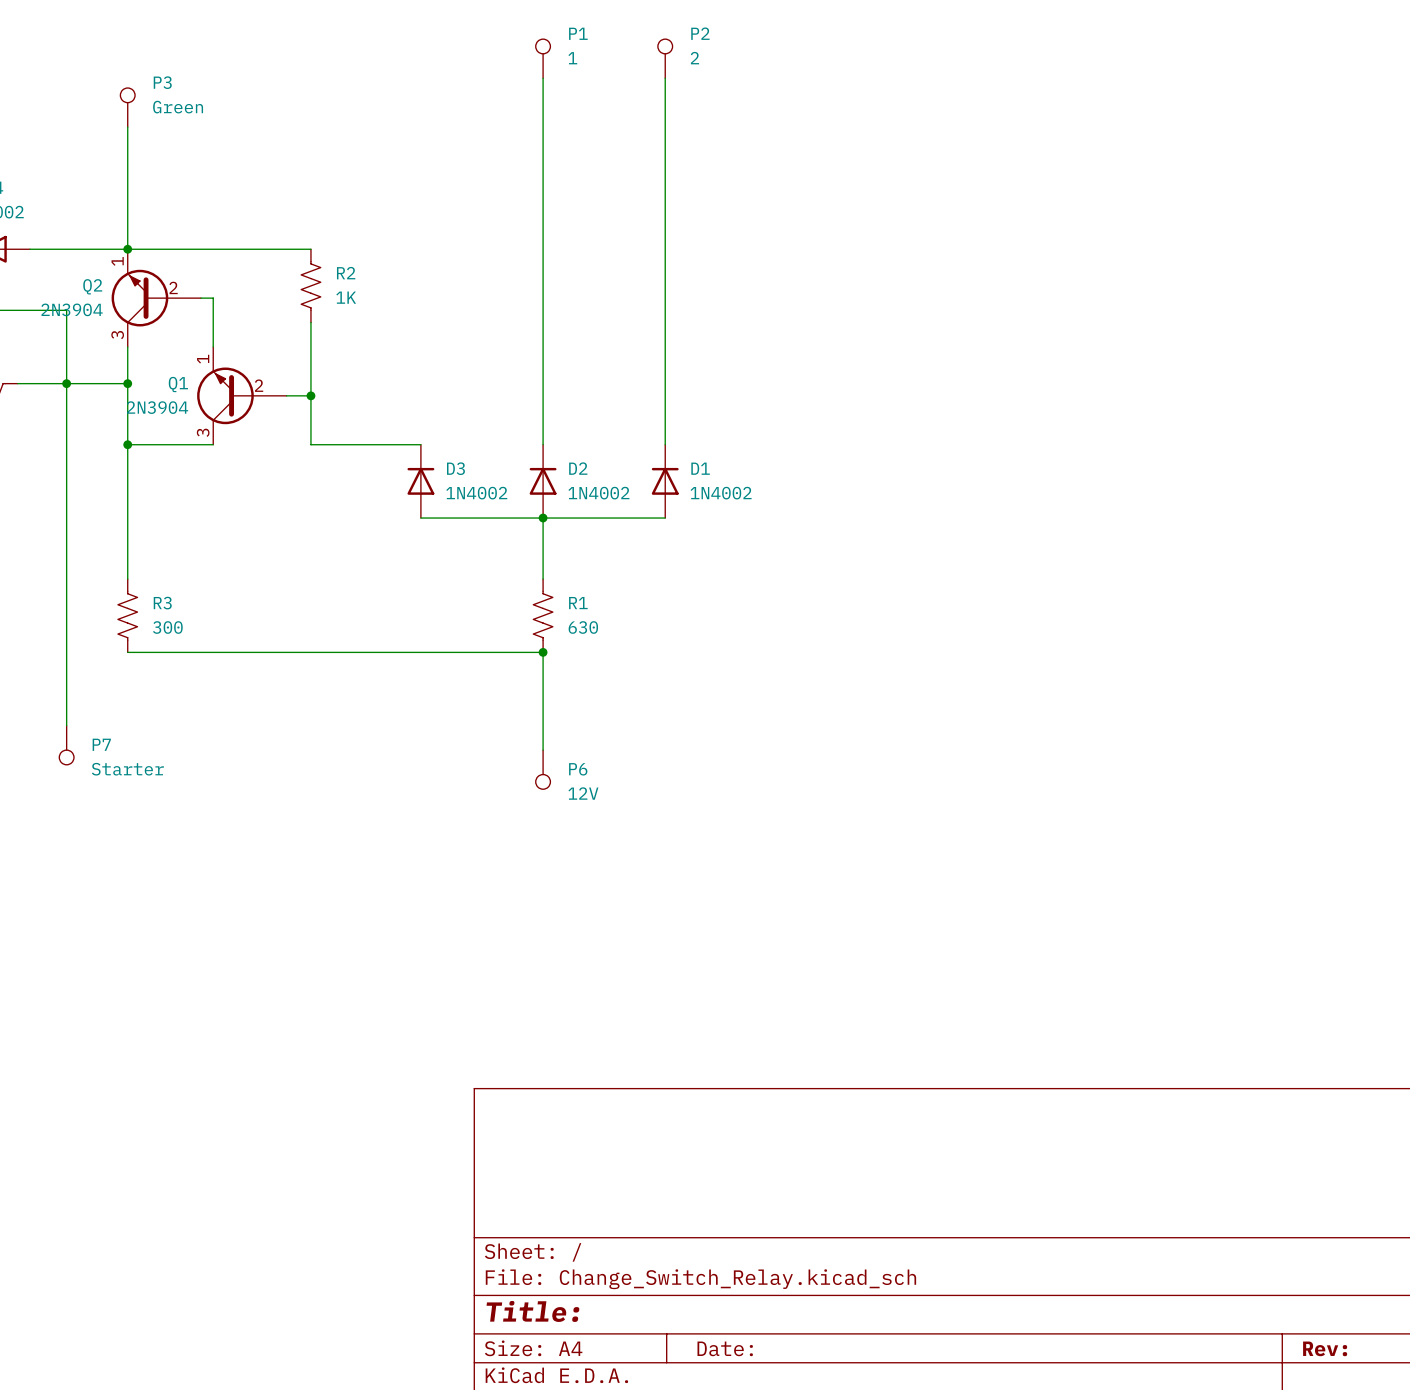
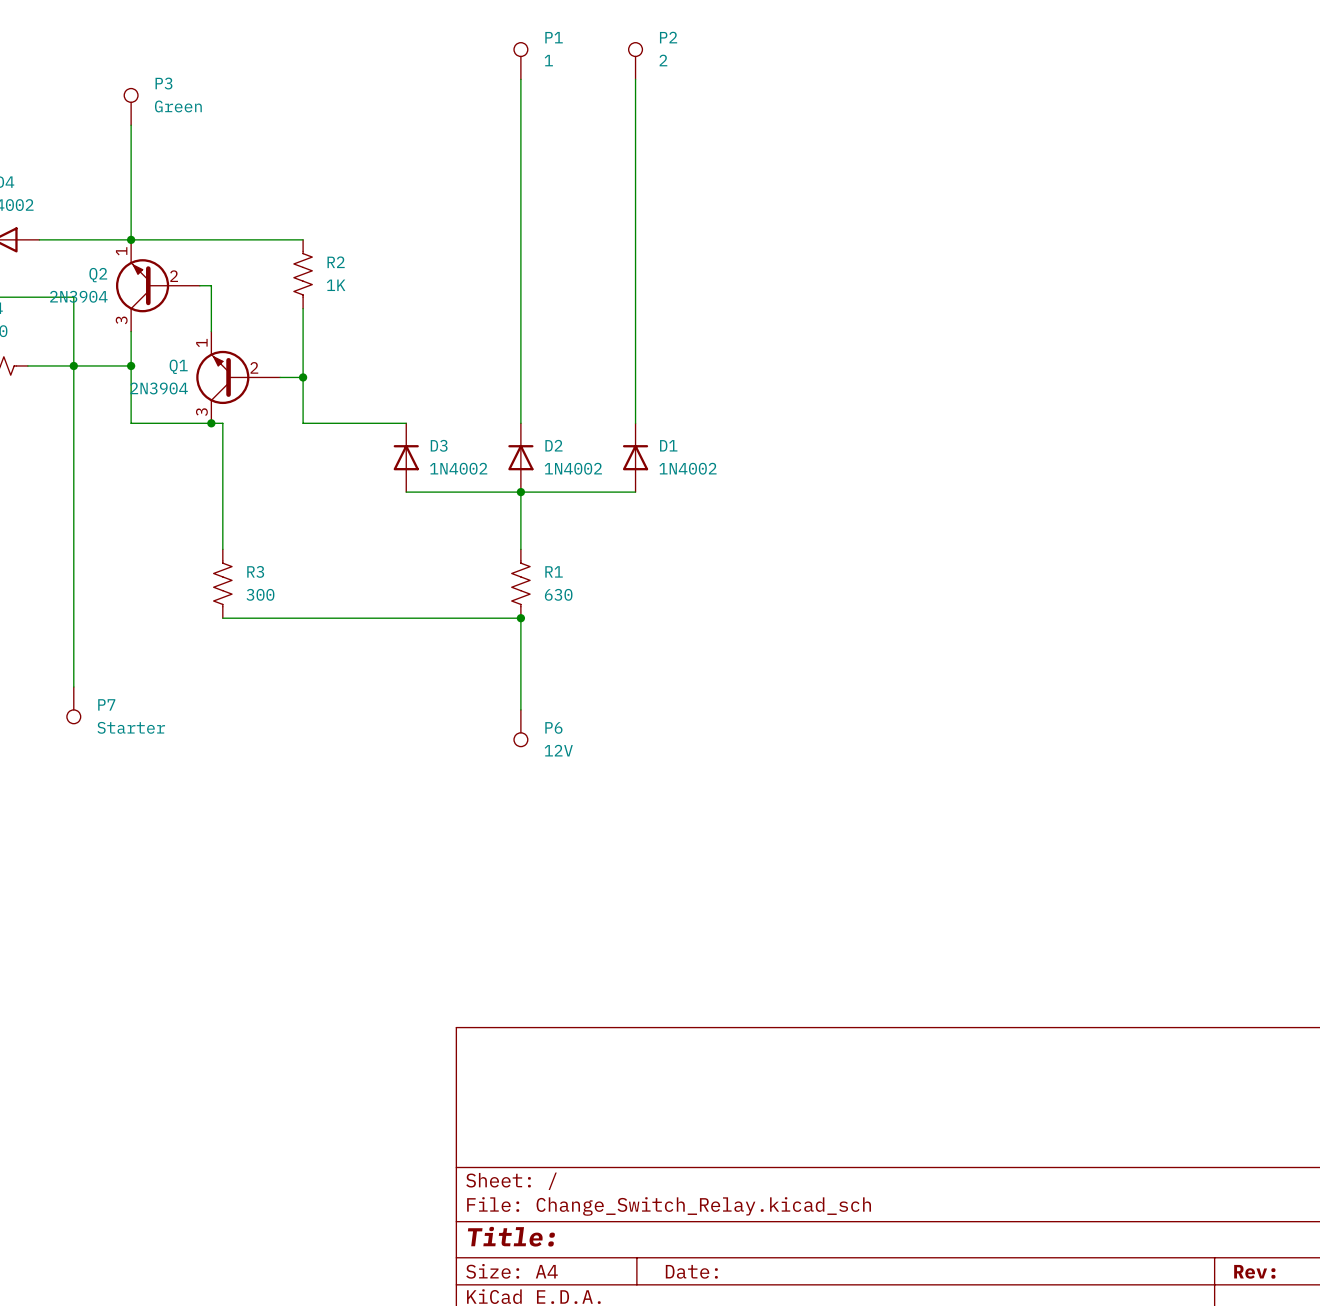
wire: (127, 444) (127, 579) -> none
junction: (127, 444) -> none
wire: none -> (211, 423) (222, 423) (222, 549)
junction: none -> (211, 423)
R3 position: (127, 615) -> (222, 583)
wire: (127, 652) (225, 652) -> none

